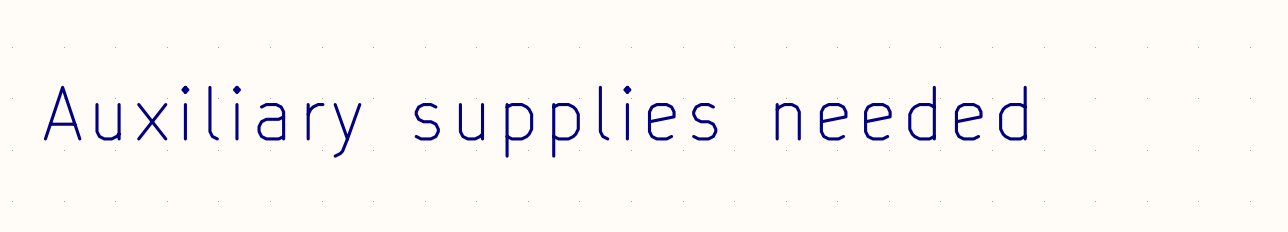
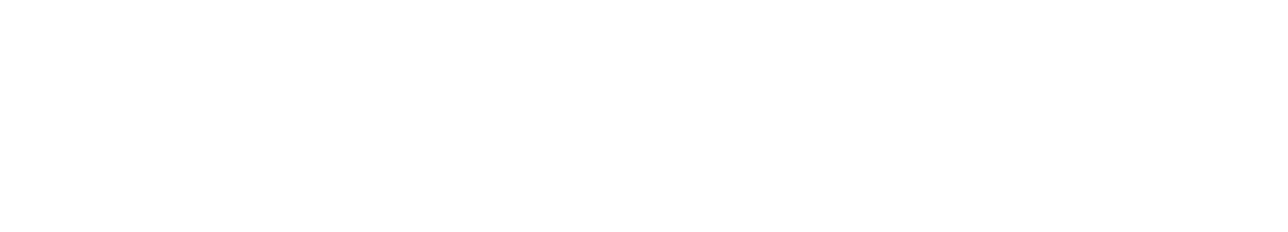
text: Auxiliary supplies needed (535, 121) -> none

